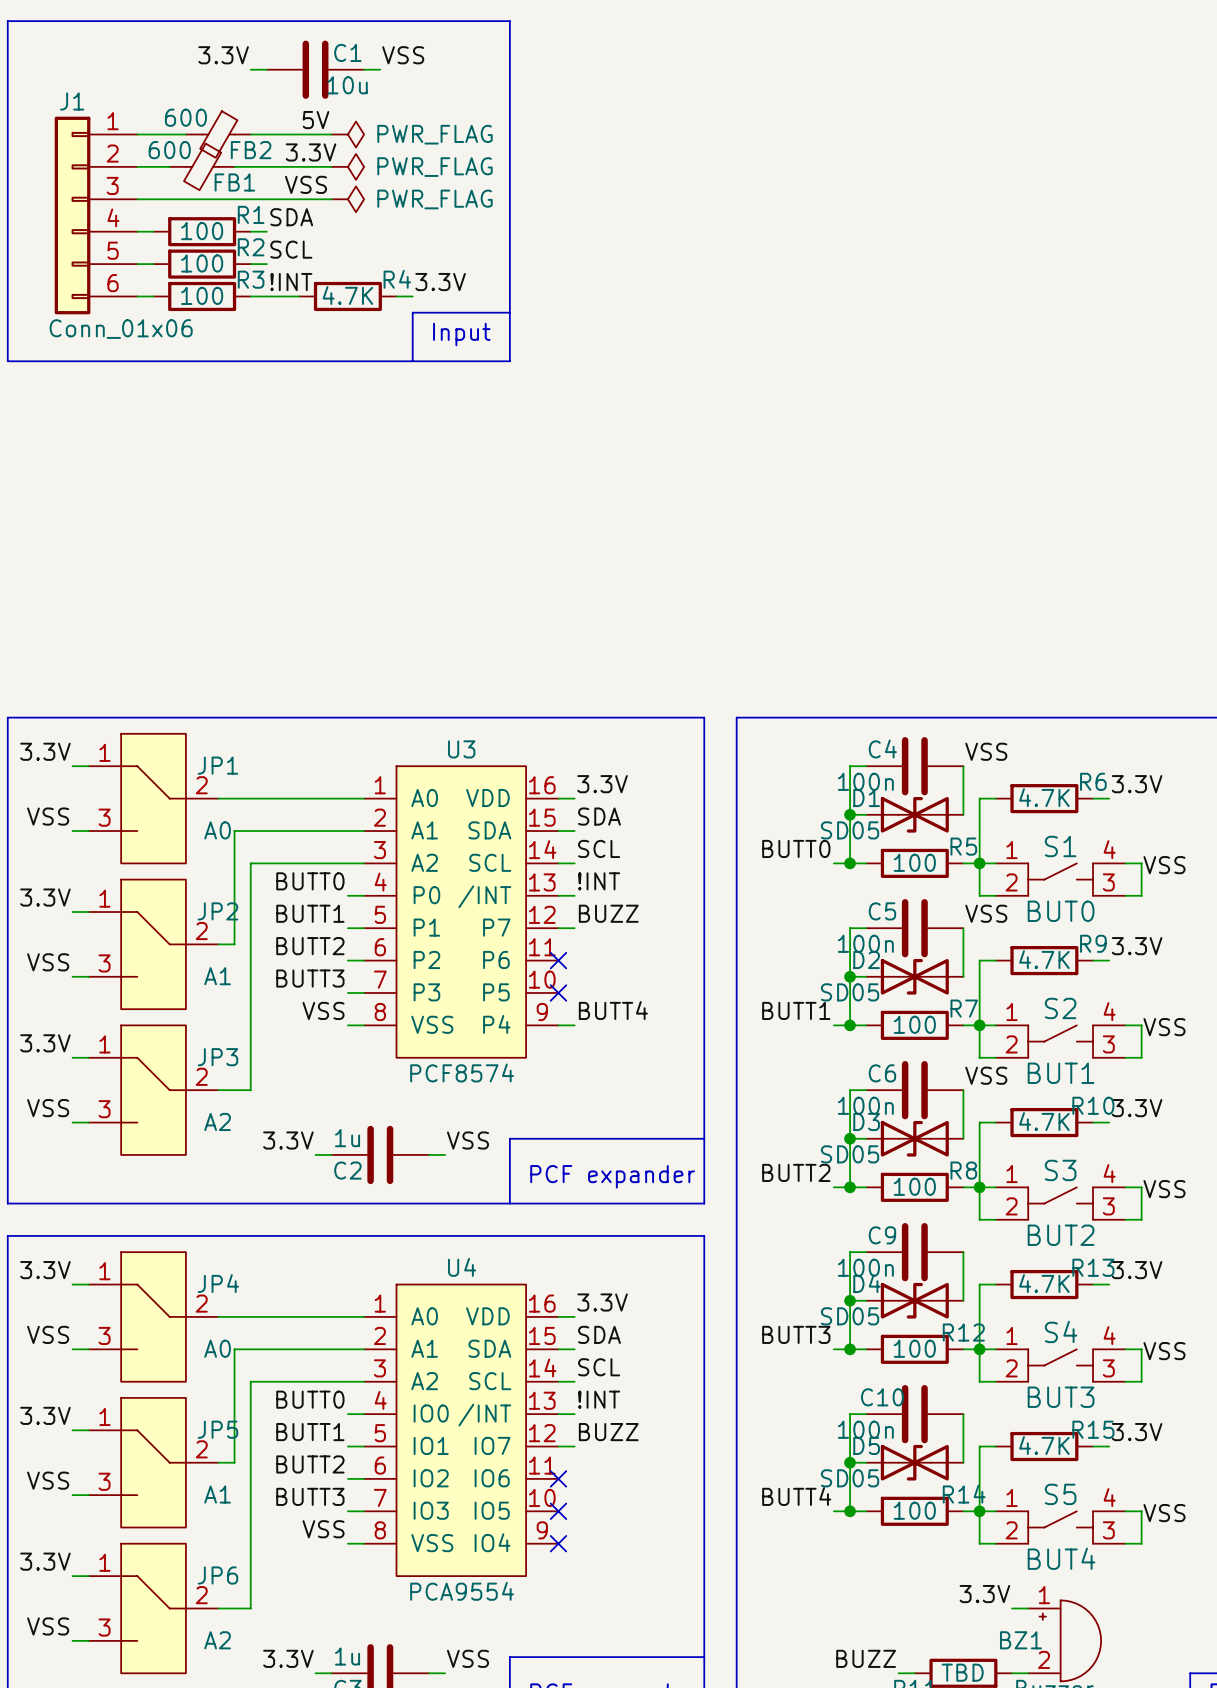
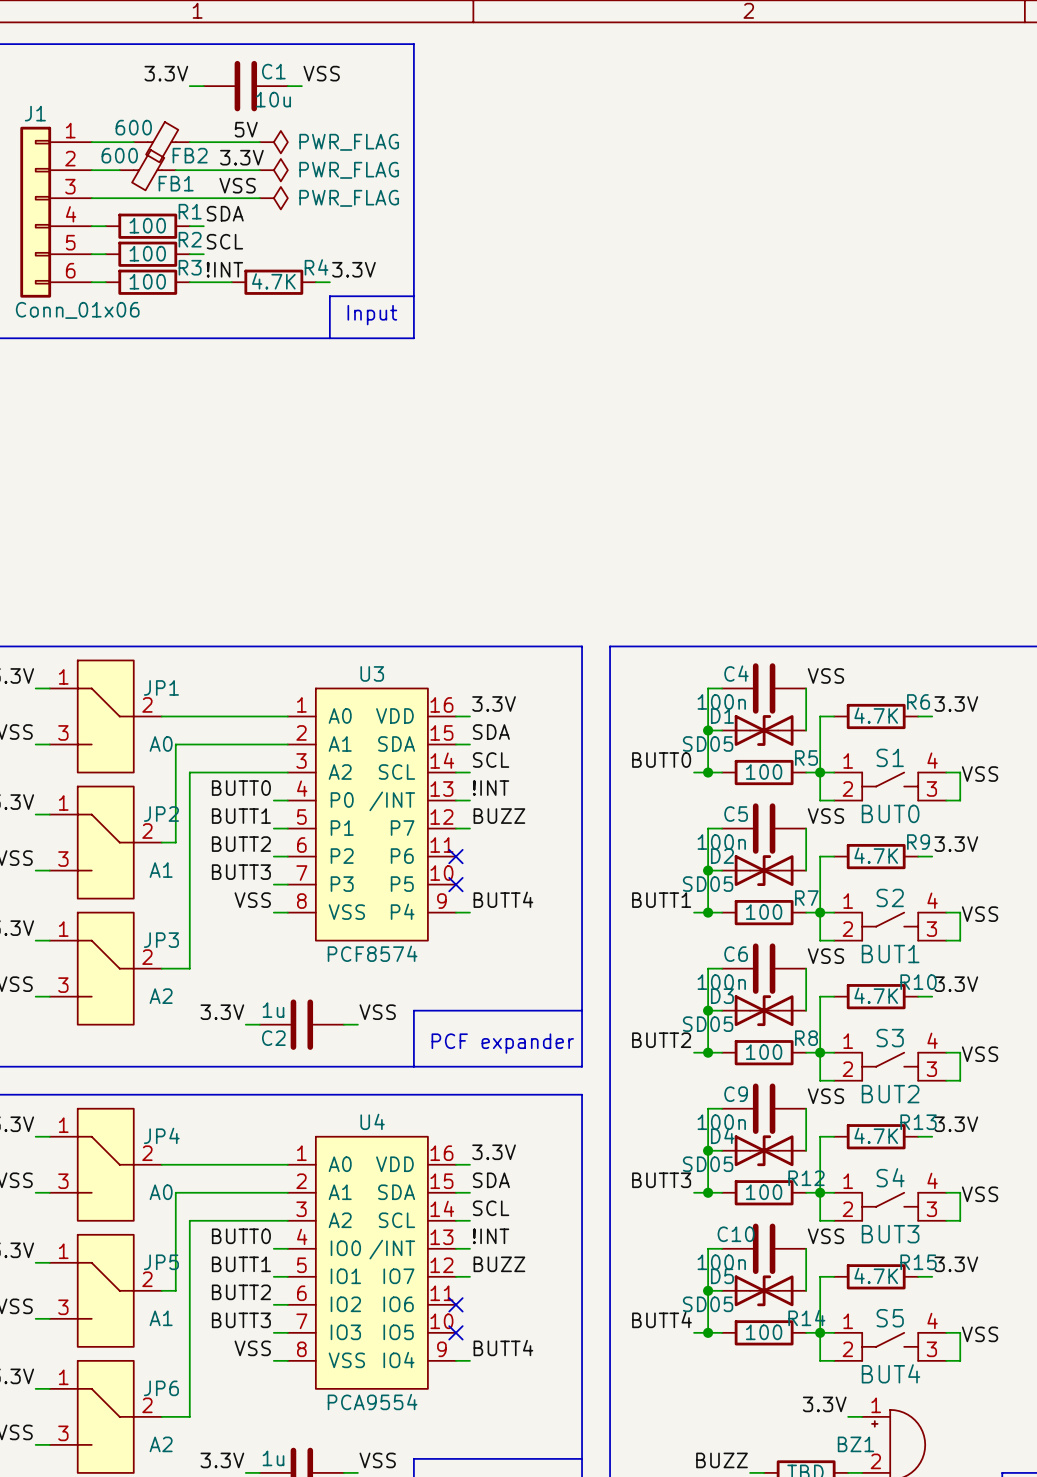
label: none -> VSS (825, 1096)
label: none -> VSS (825, 1236)
label: none -> BUTT4 (503, 1348)
wire: none -> (455, 1360) (469, 1360)
no-connect mark: (558, 1543) -> none

